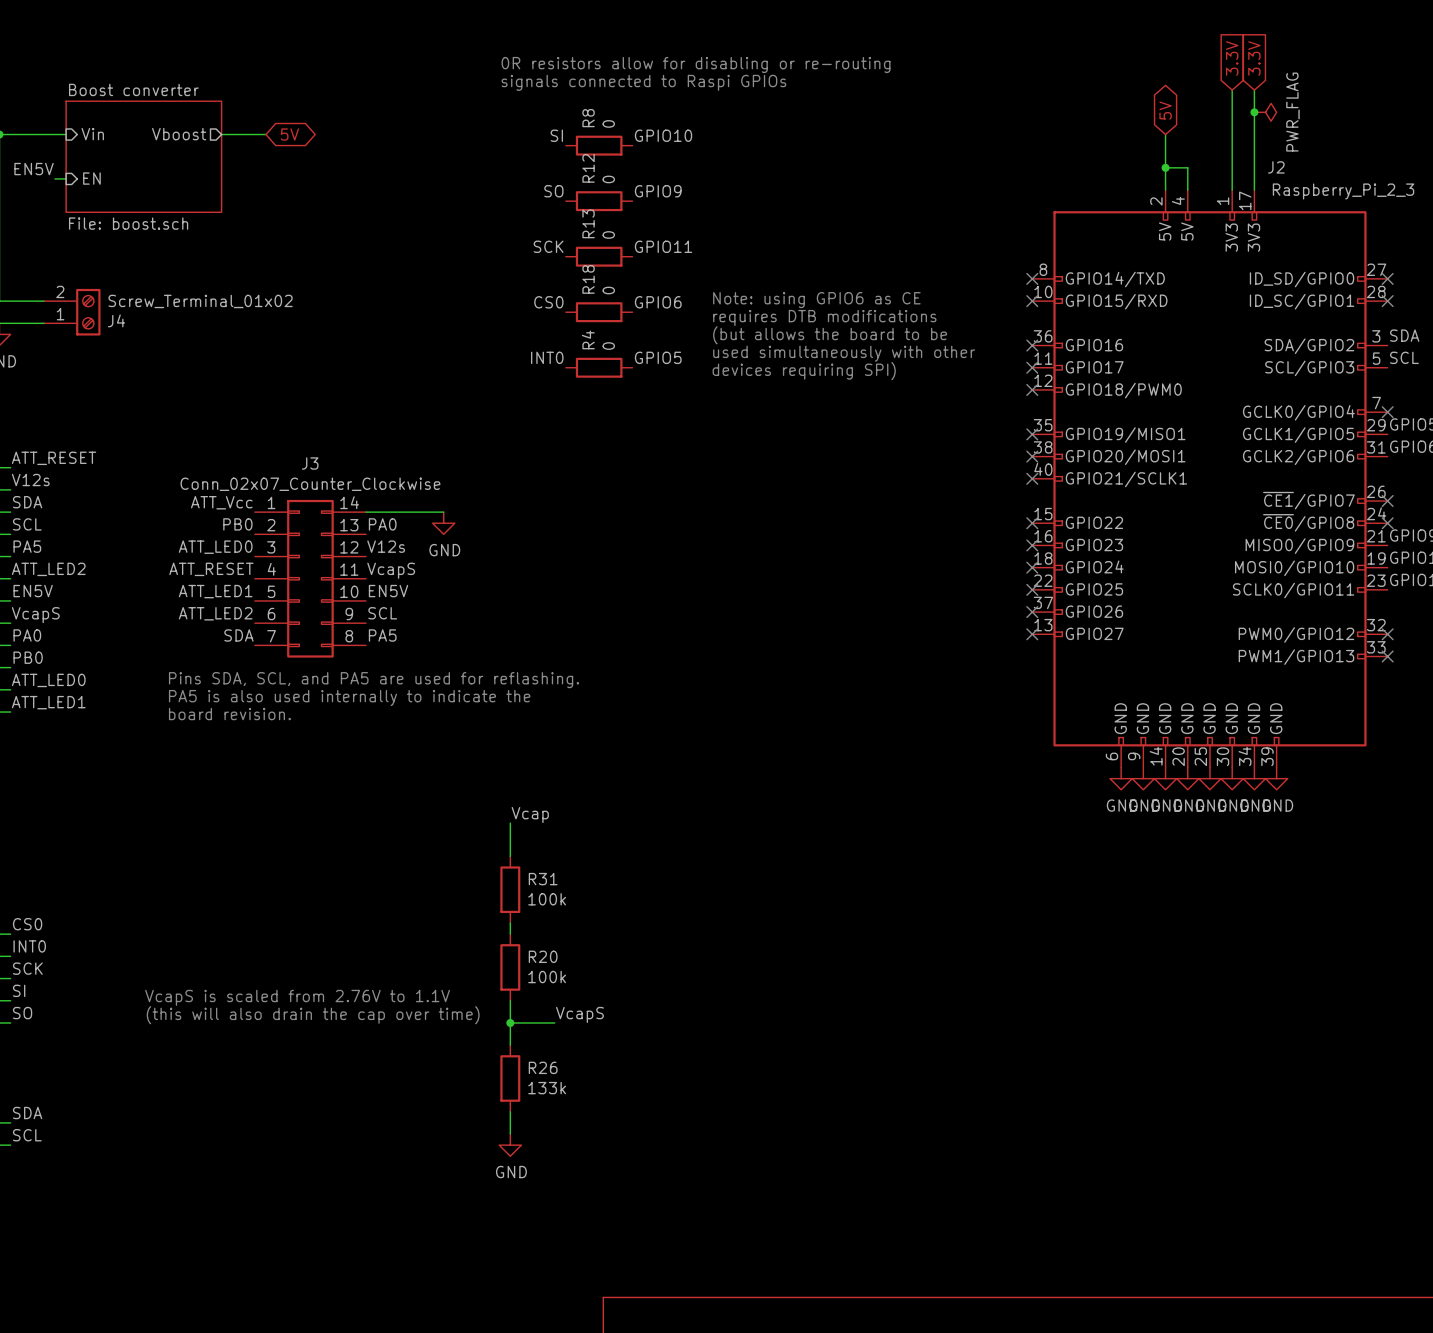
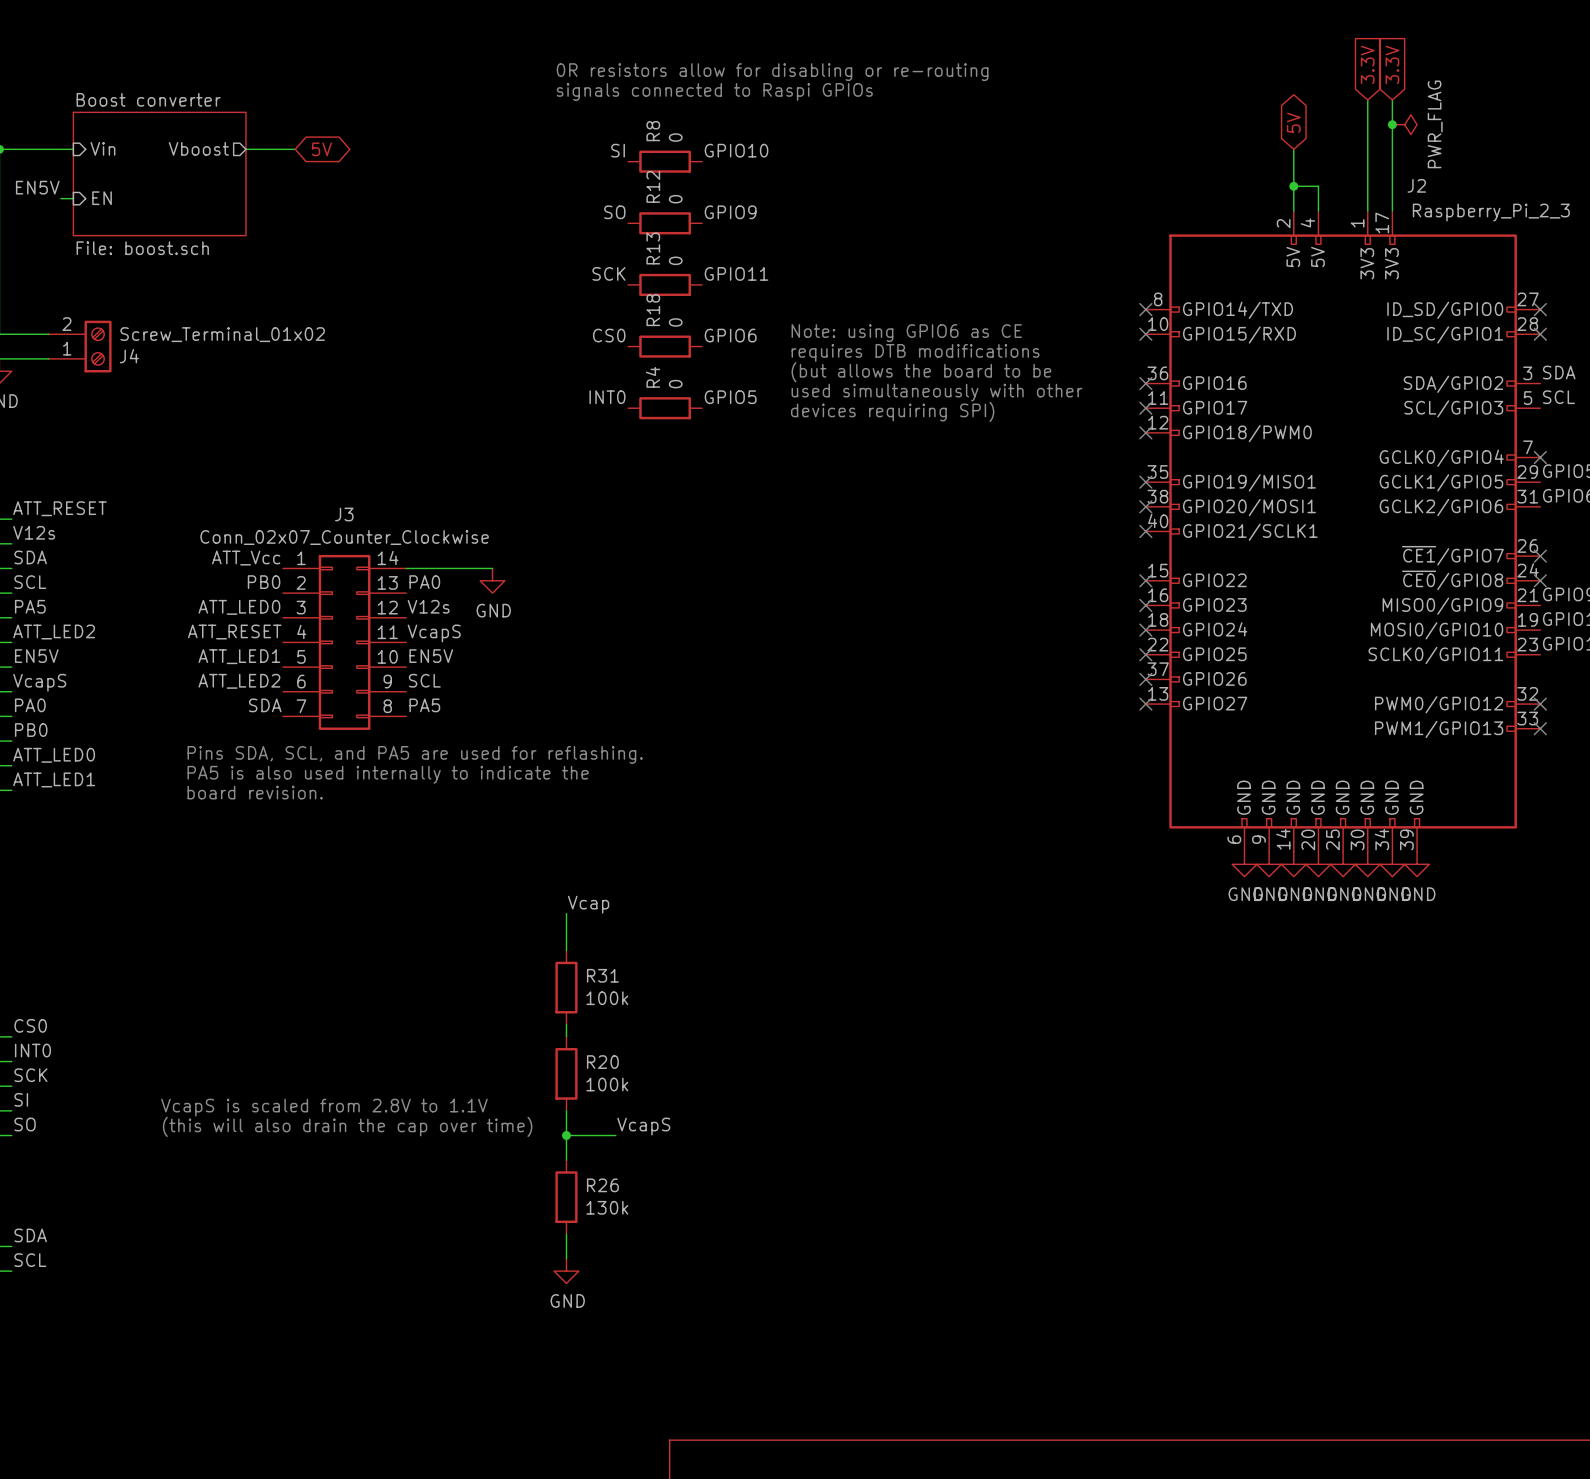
text: VcapS is scaled from 2.76V to 1.1V (297, 997) -> VcapS is scaled from 2.8V to 1.1V (324, 1107)
R26 value: 133k (547, 1088) -> 130k (607, 1207)

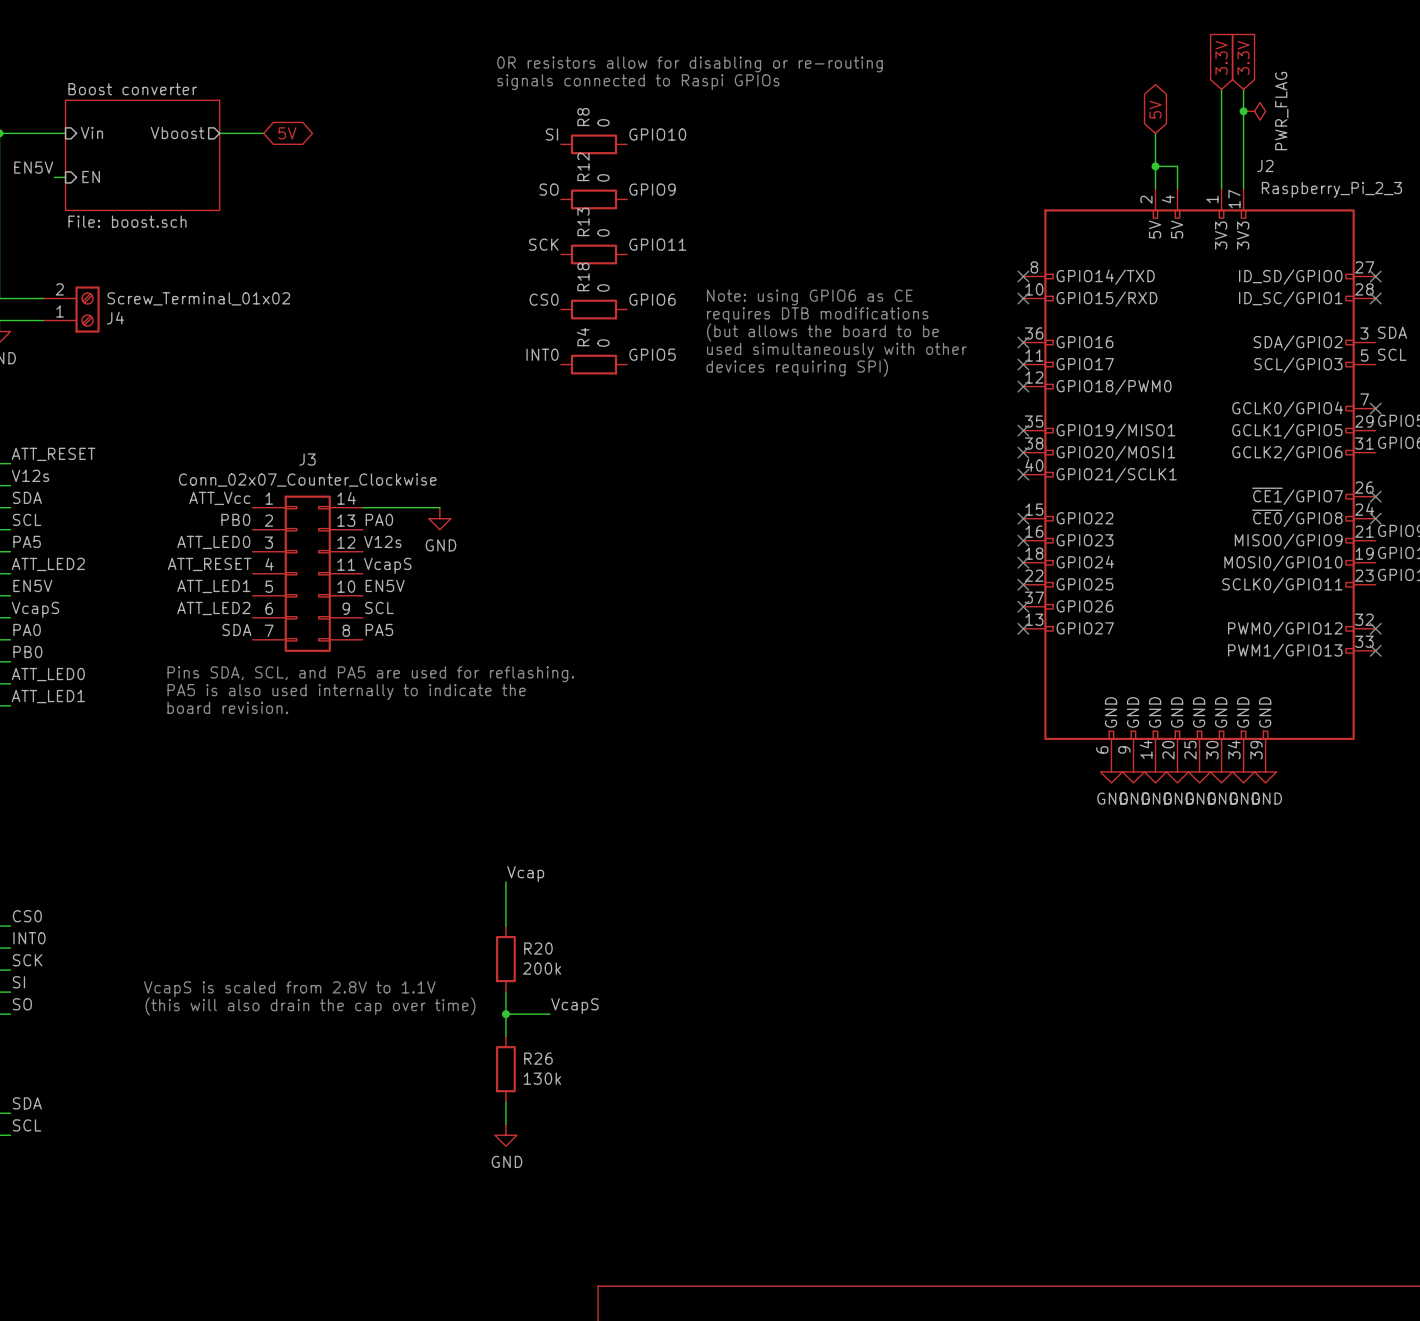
label position: Vcap (588, 904) -> Vcap (525, 874)
wire: (566, 913) (566, 950) -> (505, 882) (505, 915)
R31: 100k (566, 987) -> none
R20 value: 100k (607, 1084) -> 200k (542, 968)

